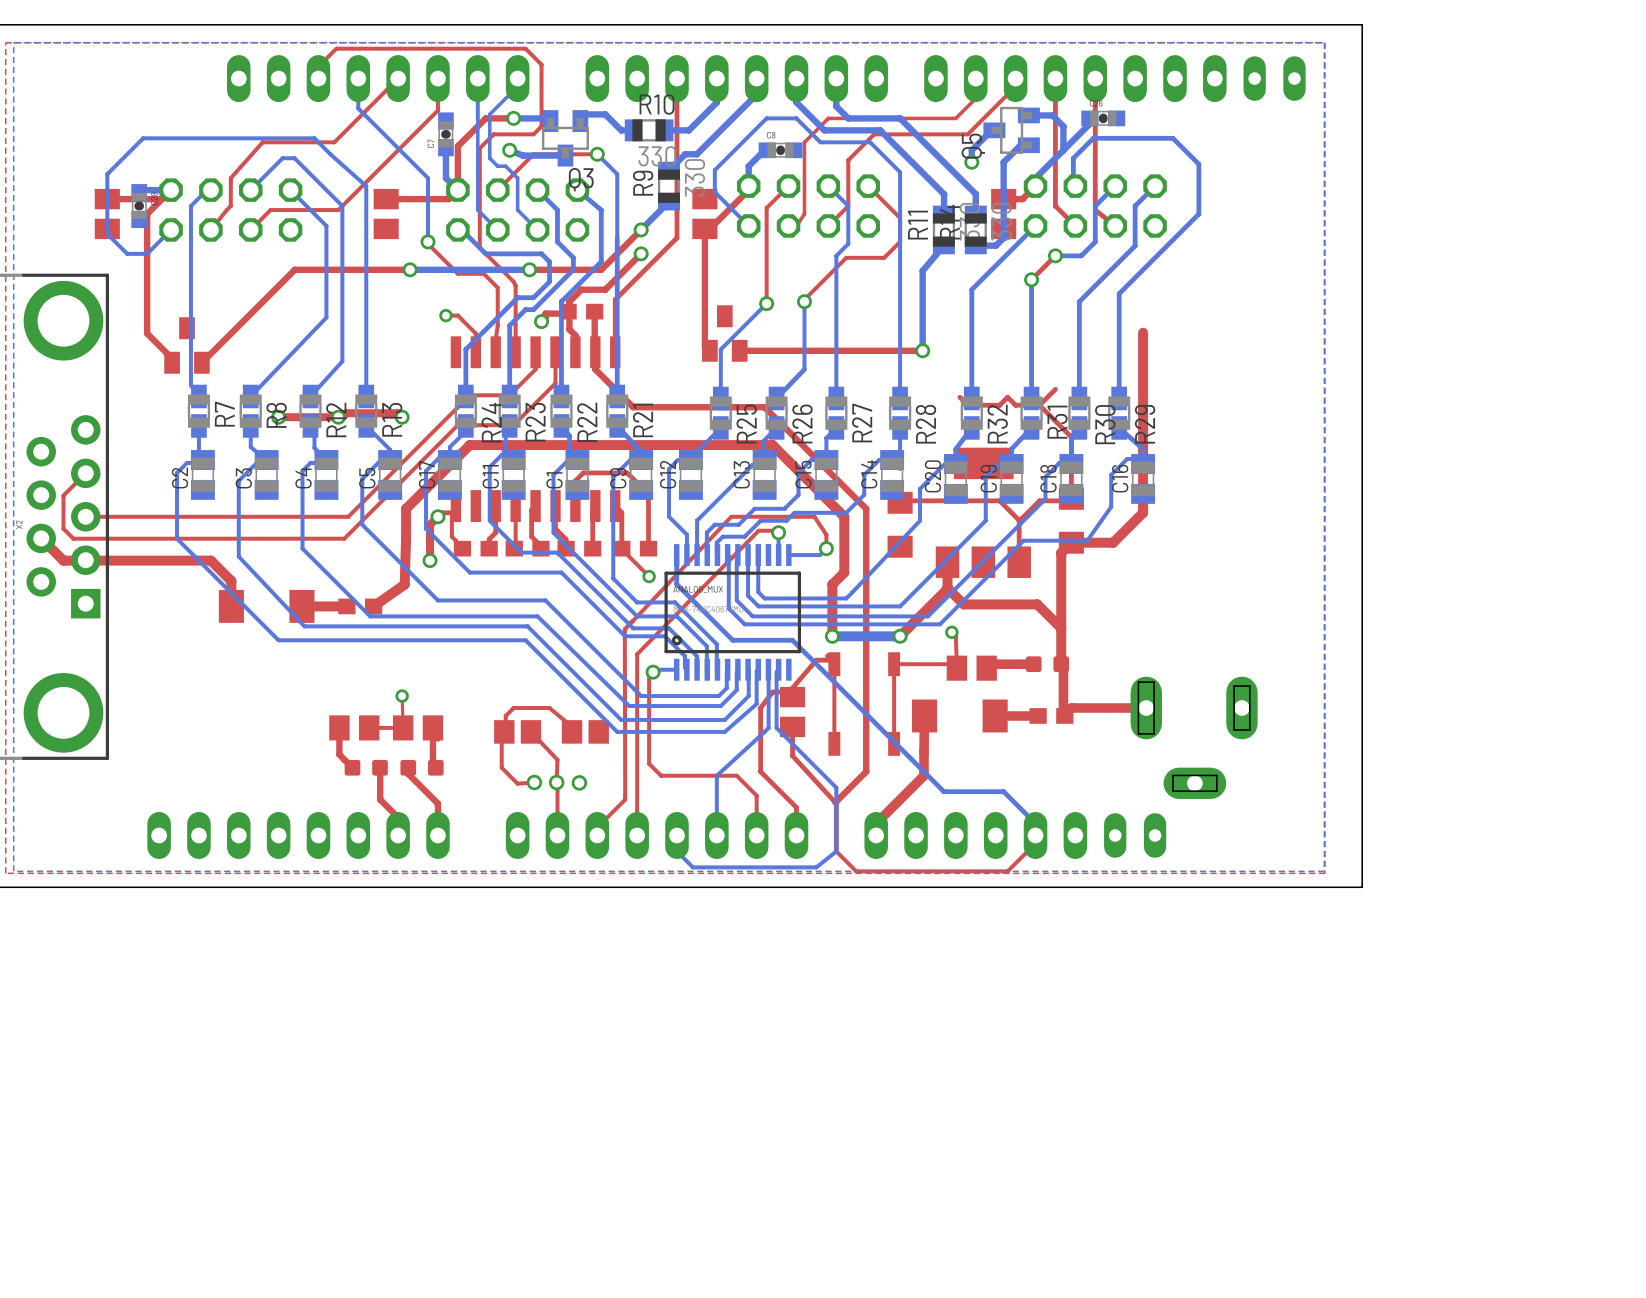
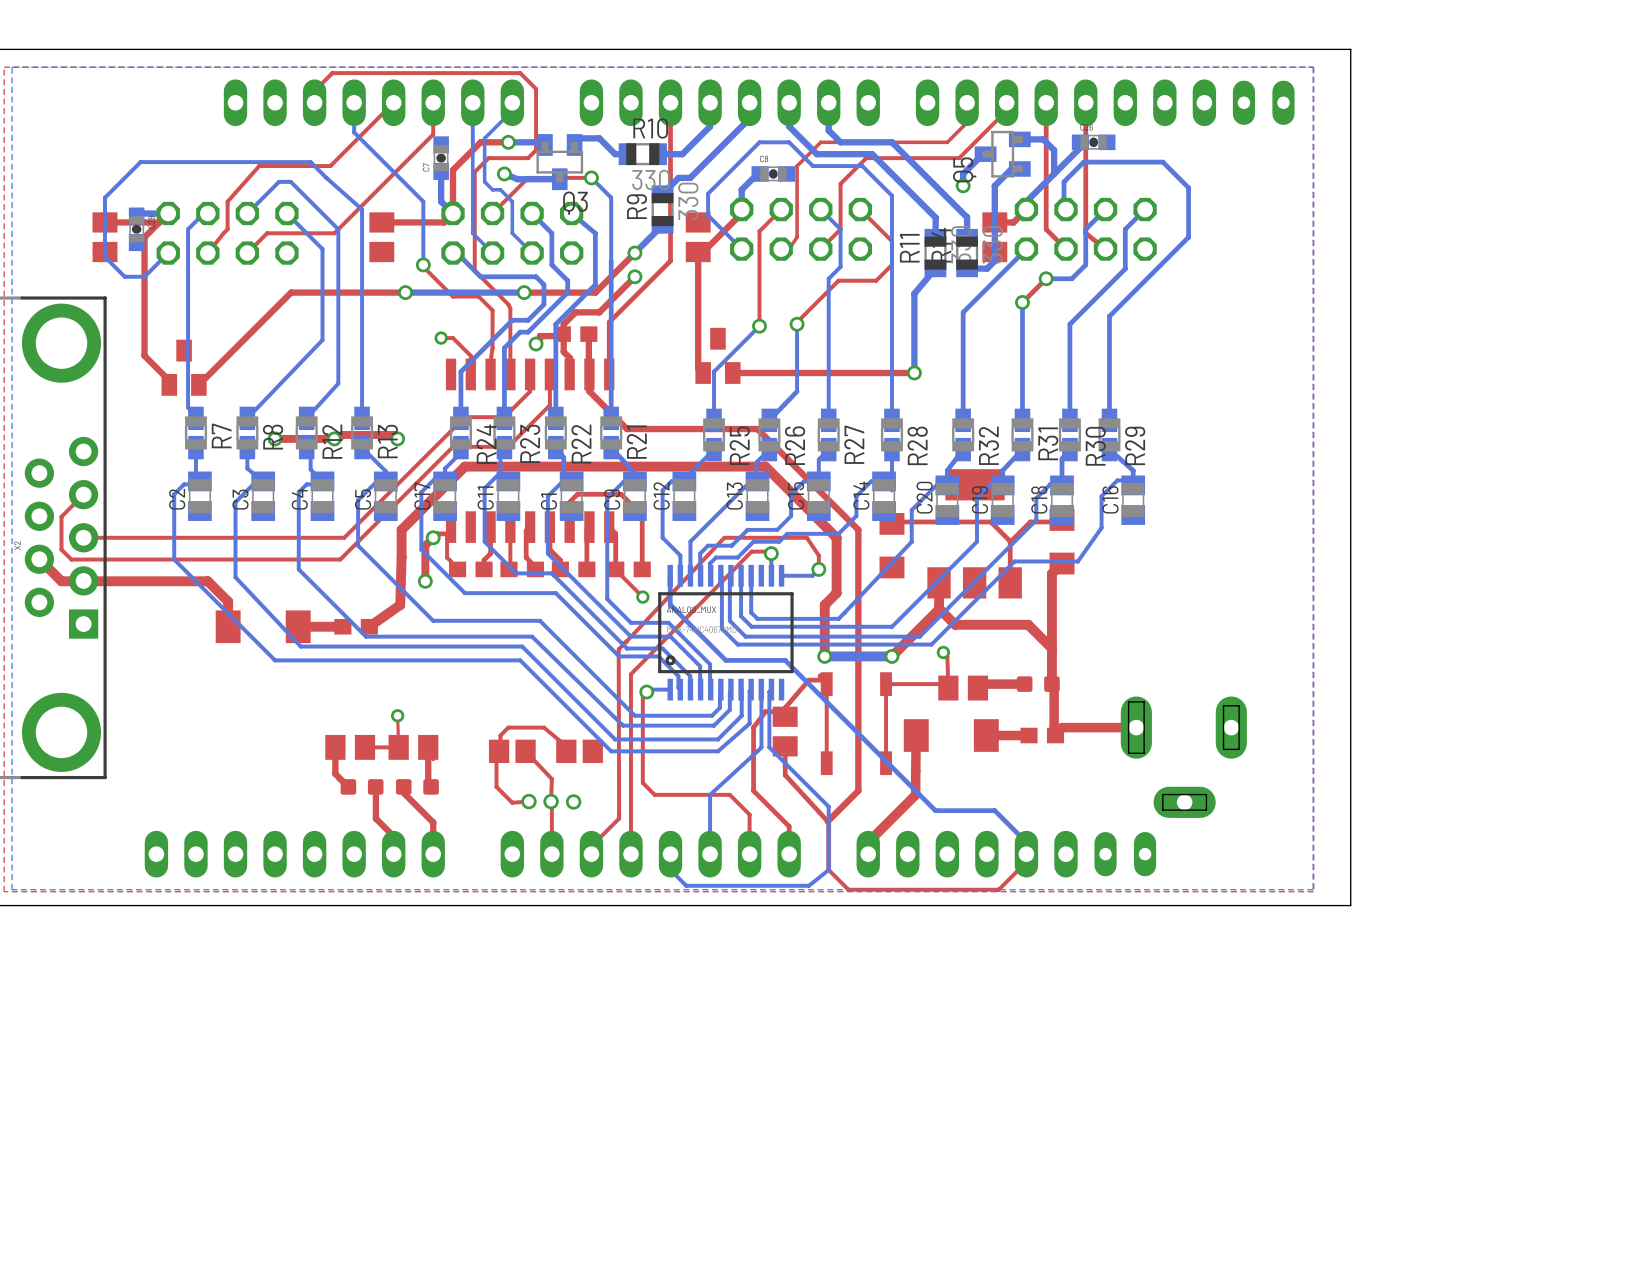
top track: (1143, 332) (1143, 512) (1113, 542) (1071, 542) -> none
top track: (1055, 389) (1039, 405) -> none
top track: (959, 397) (967, 405) (999, 405) (1007, 397) (1015, 405) (1039, 405) -> none
top track: (1039, 405) (1071, 437) (1071, 498) -> none

